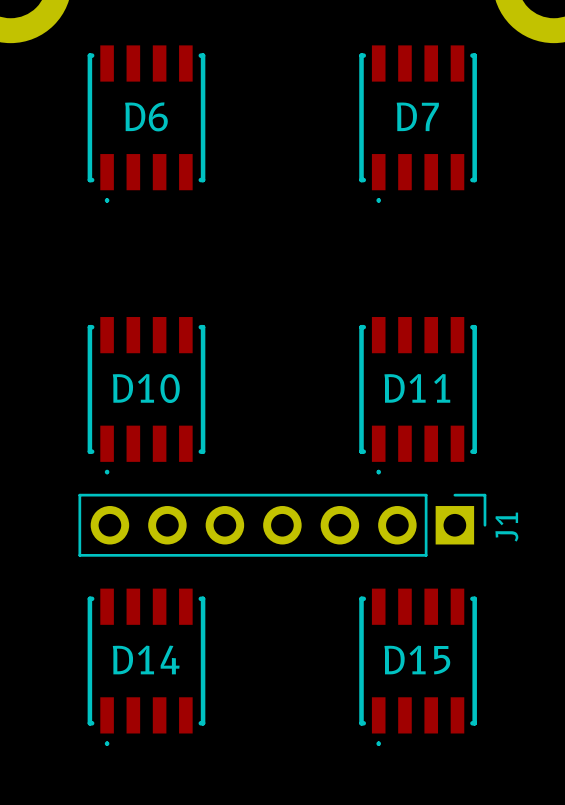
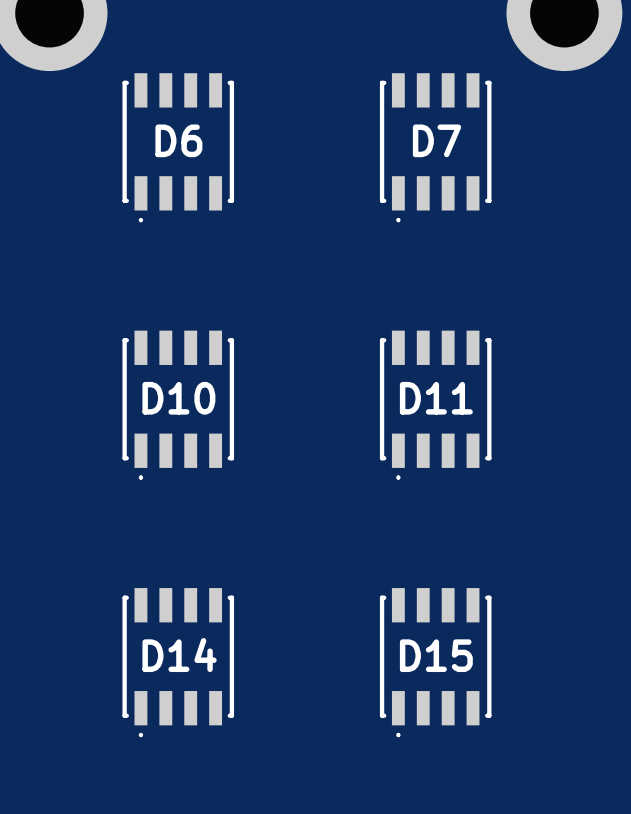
J1: (282, 525) -> none

